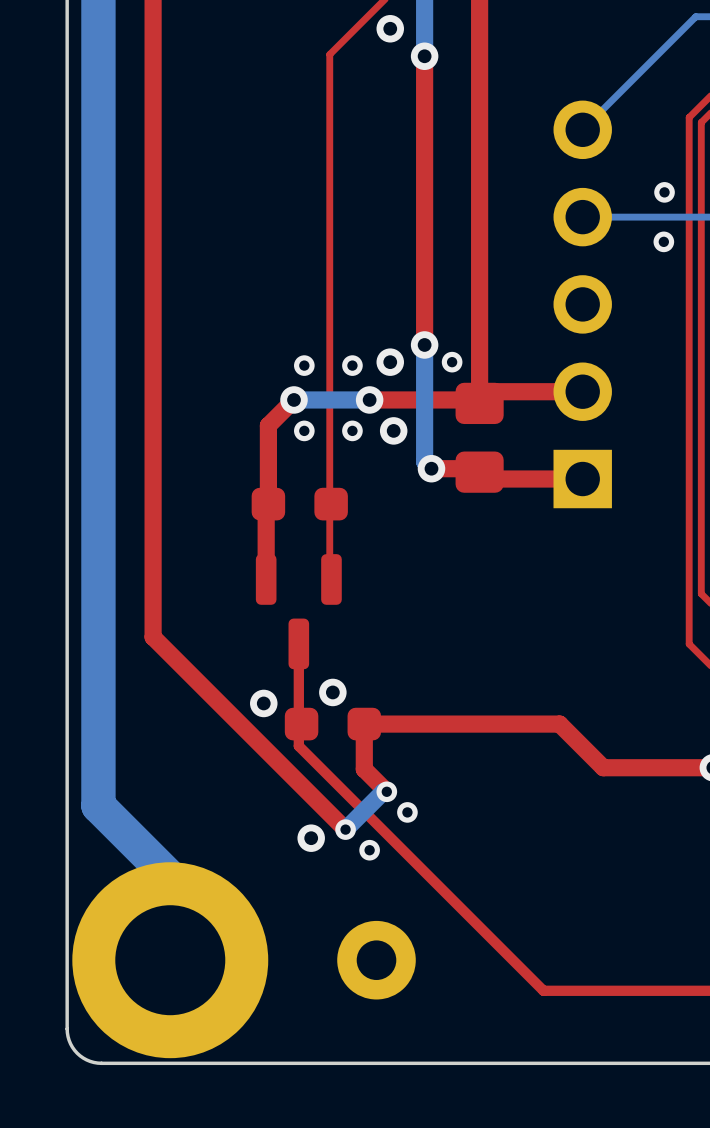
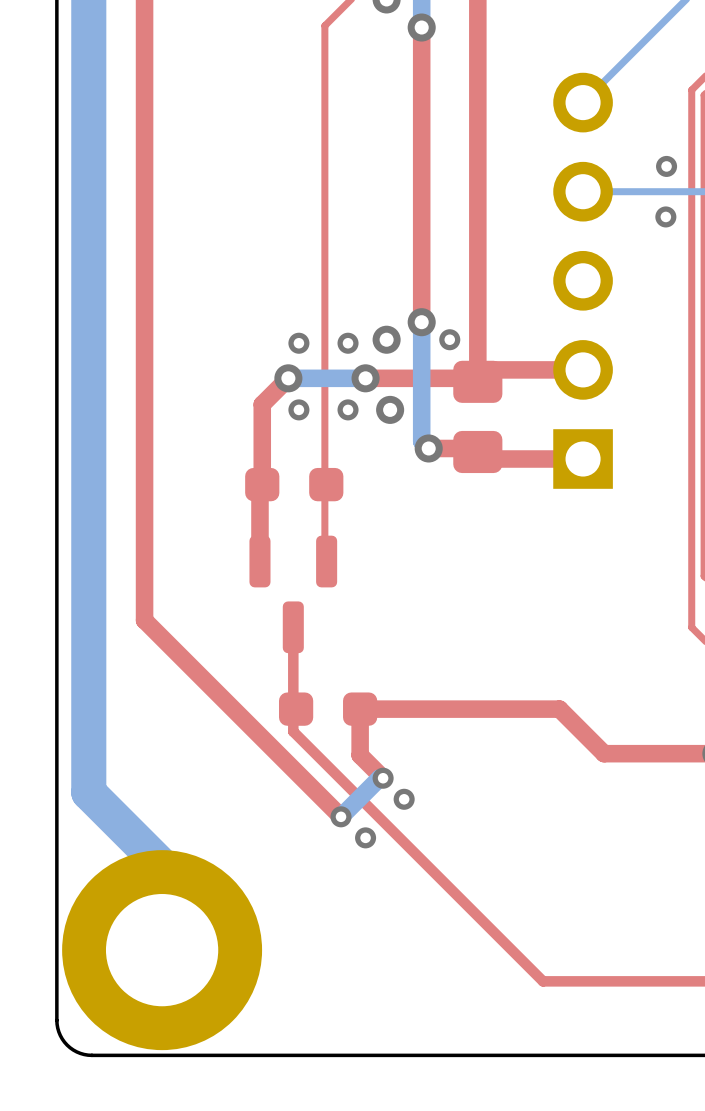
via: (332, 692) -> none
via: (263, 703) -> none
via: (311, 838) -> none
part: (376, 960) -> none

